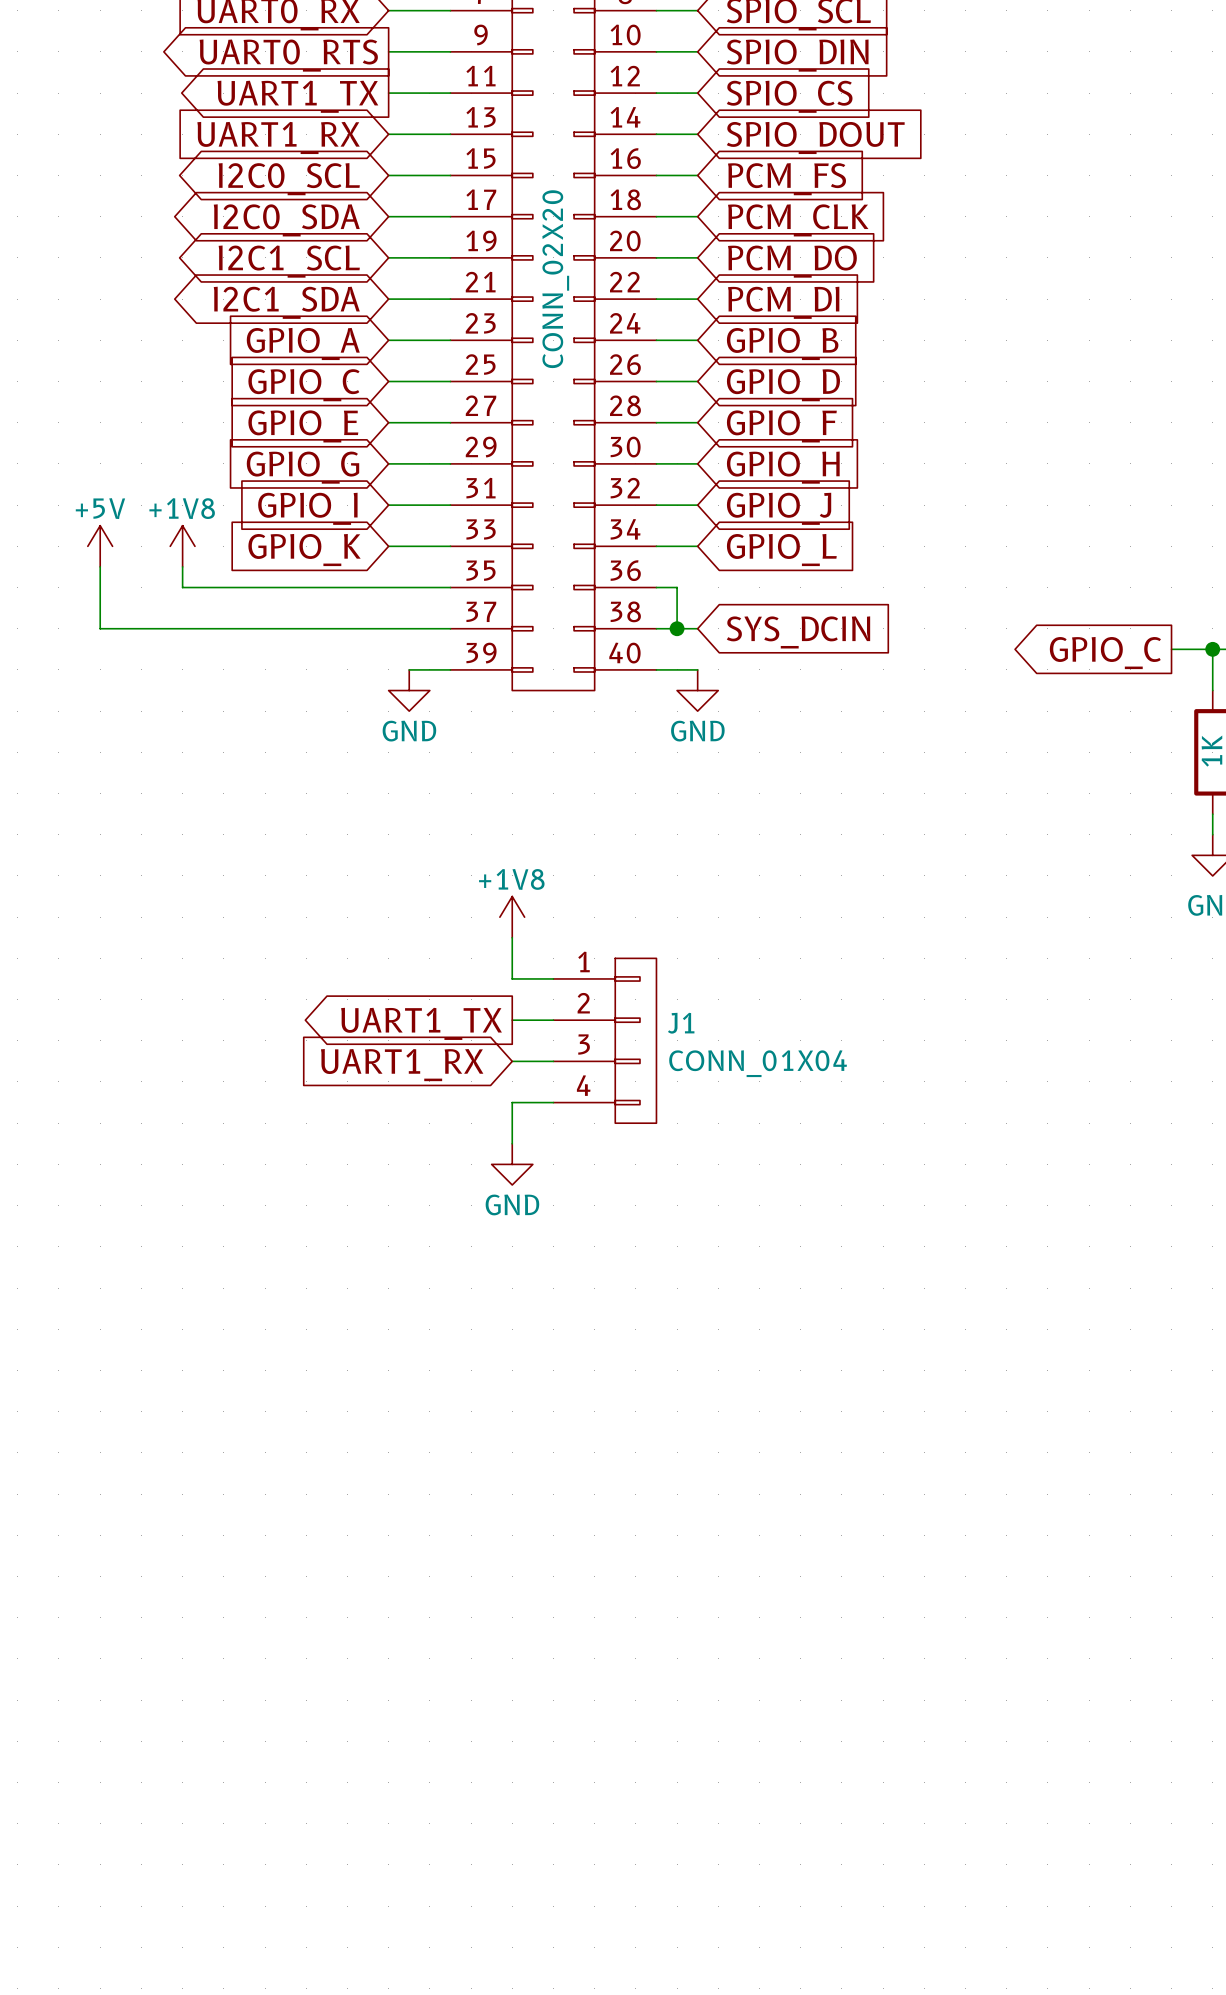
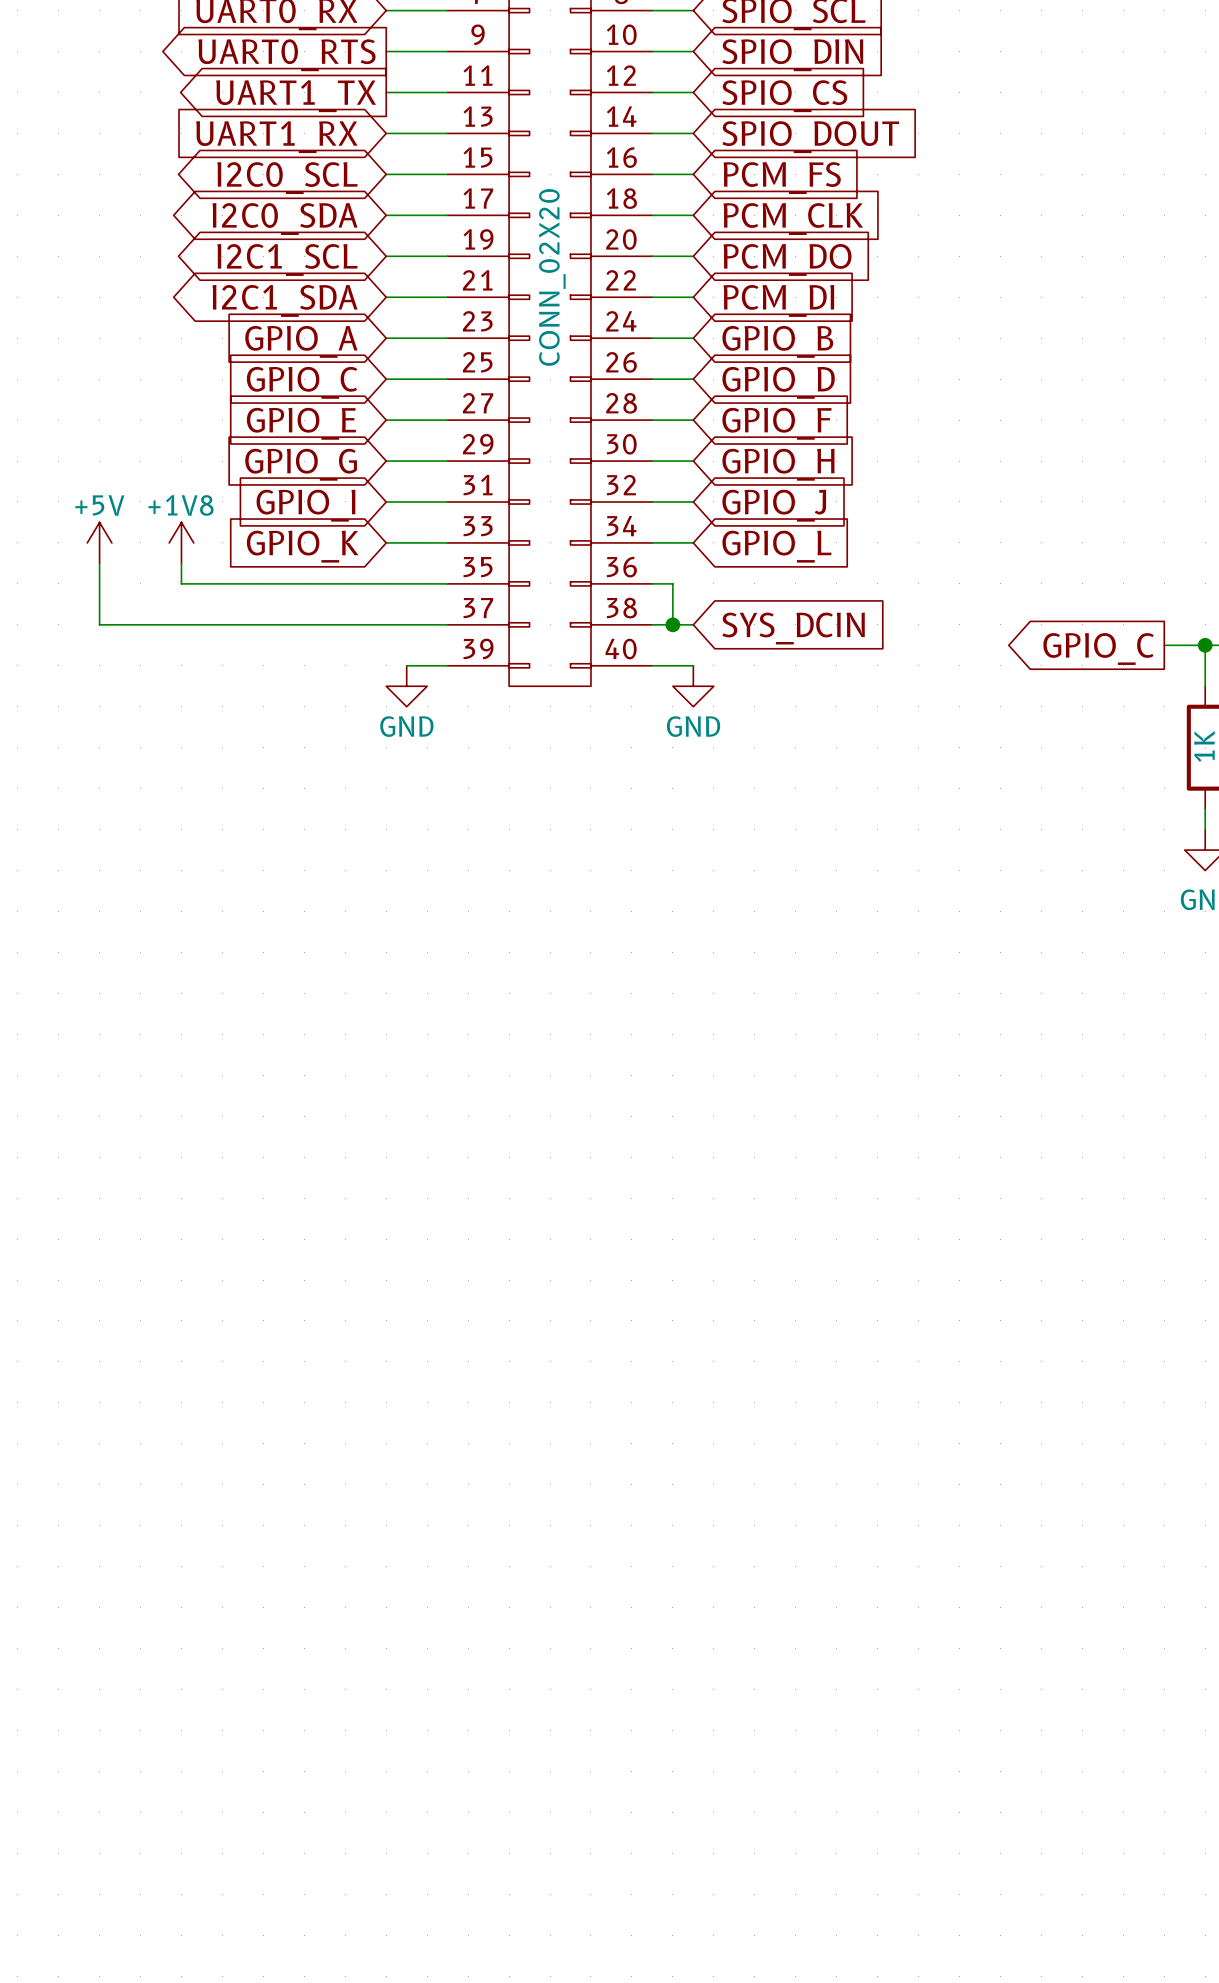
power symbol: +1V8 (512, 917) -> none
wire: (512, 937) (512, 978) (553, 978) -> none
wire: (512, 1020) (553, 1020) -> none
global label: UART1_TX (421, 1023) -> none
J1: CONN_01X04 (604, 1040) -> none
wire: (512, 1061) (553, 1061) -> none
global label: UART1_RX (402, 1065) -> none
wire: (553, 1102) (512, 1102) (512, 1143) -> none
power symbol: GND (512, 1164) -> none

